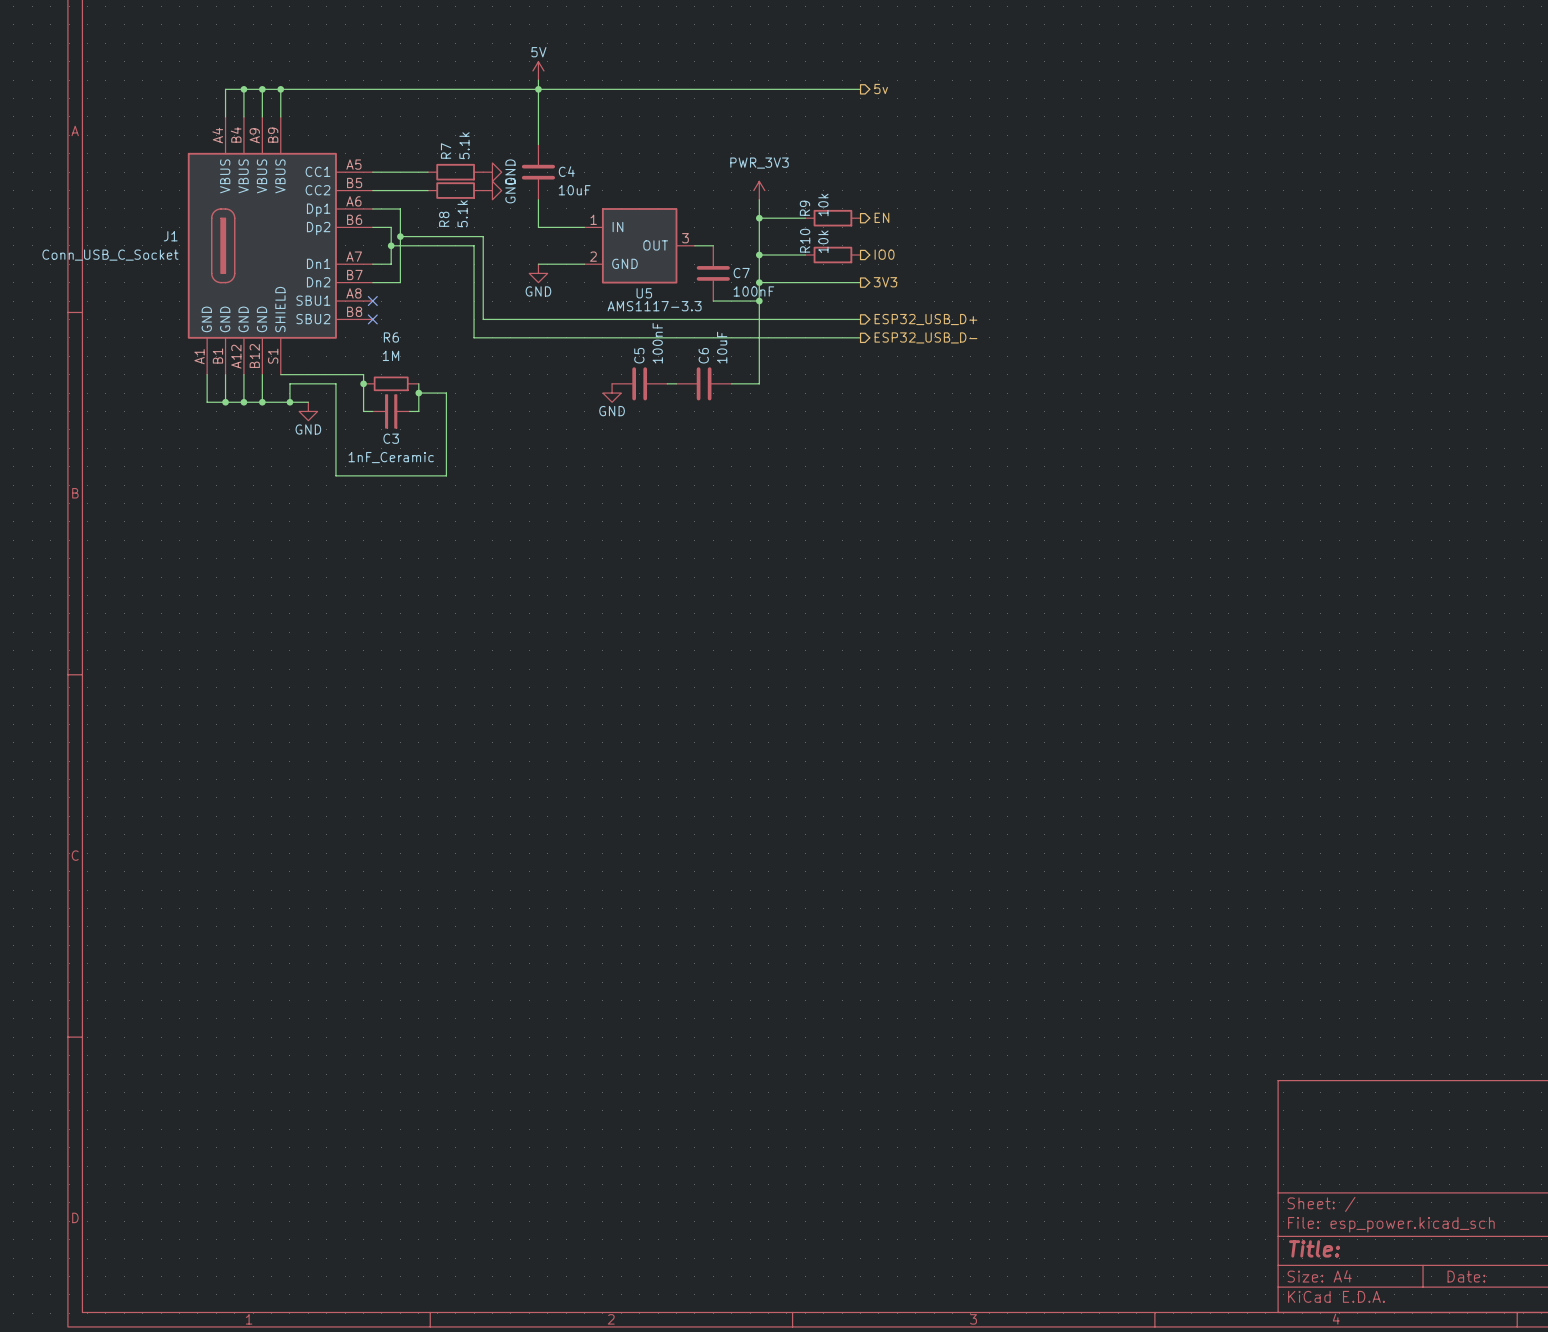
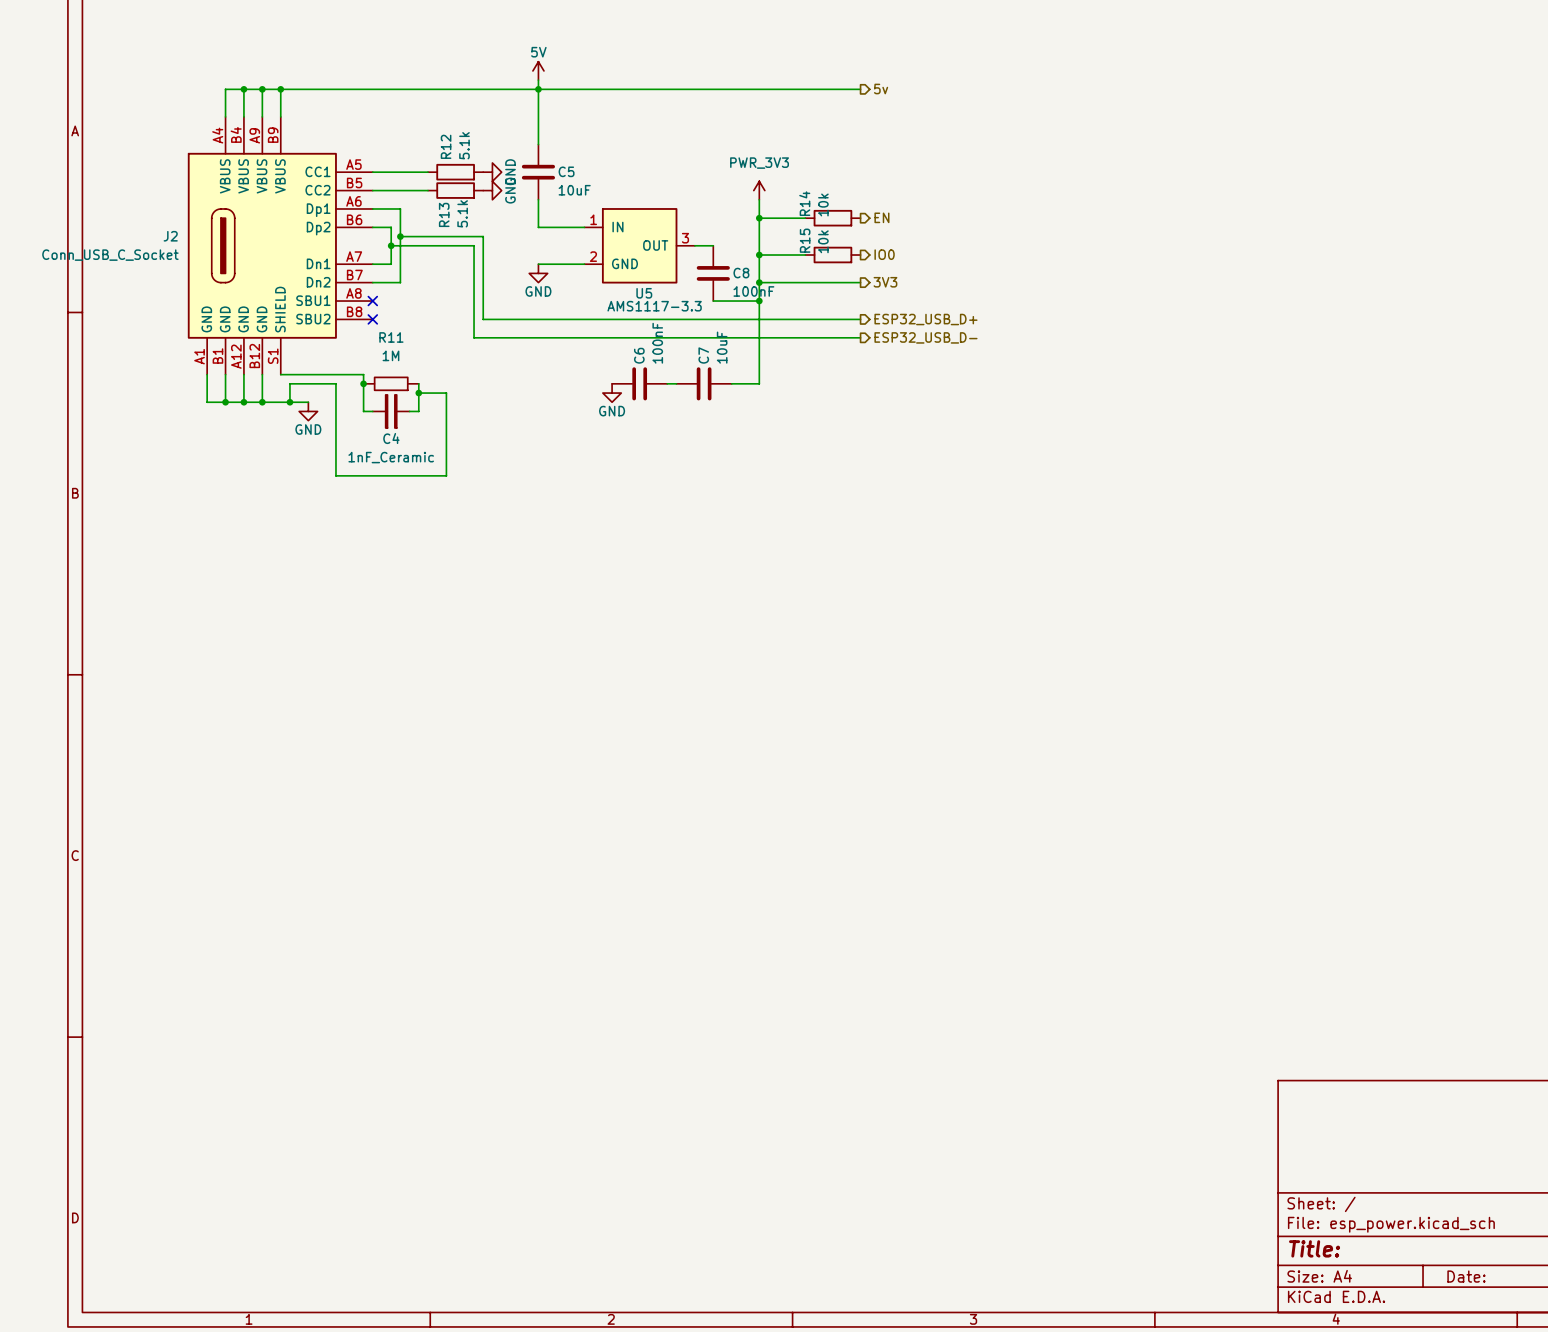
R7 name: R7 (446, 150) -> R12 (446, 146)
C4 name: C4 (566, 171) -> C5 (566, 171)
R9 name: R9 (804, 208) -> R14 (804, 203)
R8 name: R8 (444, 219) -> R13 (444, 214)
J1 name: J1 (170, 236) -> J2 (170, 236)
R10 name: R10 (805, 240) -> R15 (805, 240)
C7 name: C7 (741, 273) -> C8 (741, 273)
R6 name: R6 (391, 337) -> R11 (391, 337)
C5 name: C5 (639, 355) -> C6 (639, 355)
C6 name: C6 (703, 355) -> C7 (703, 355)
C3 name: C3 (391, 438) -> C4 (391, 438)

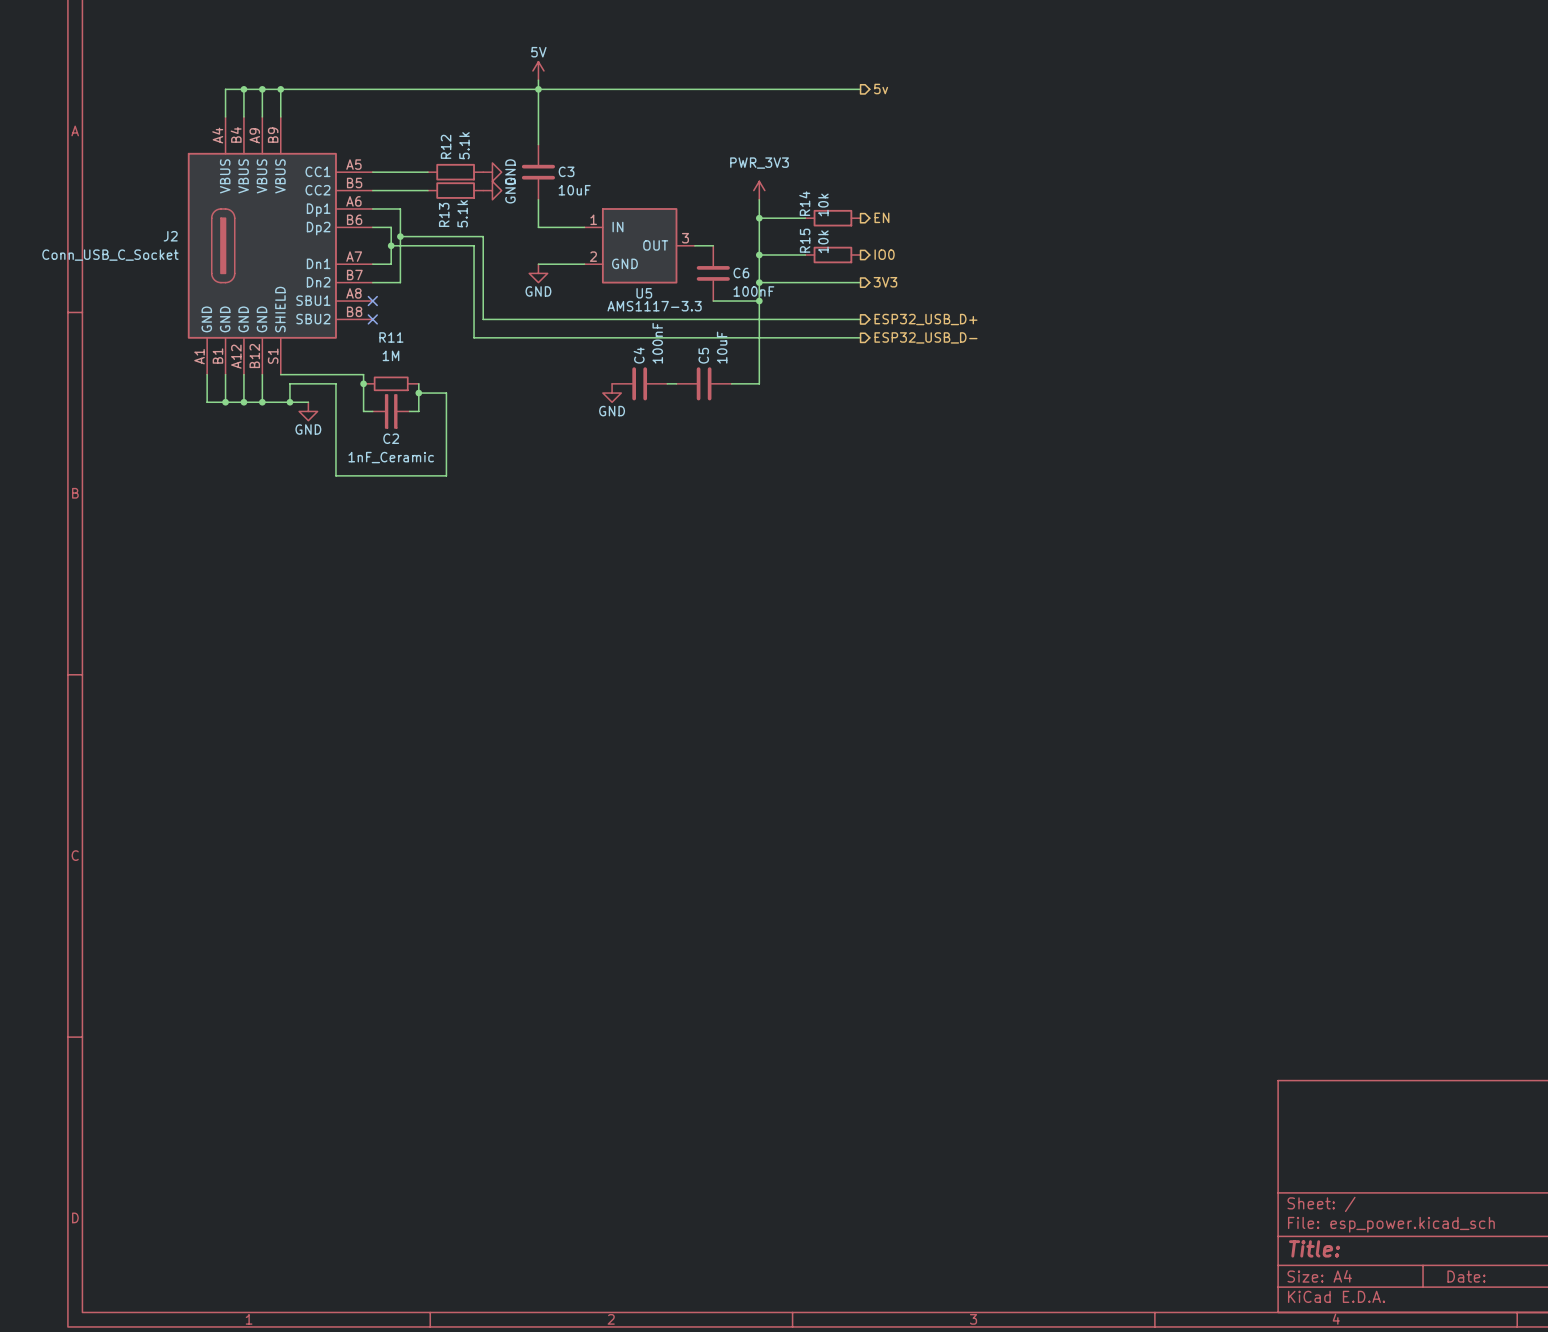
C5 name: C5 (566, 171) -> C3 (566, 171)
C8 name: C8 (741, 273) -> C6 (741, 273)
C6 name: C6 (639, 355) -> C4 (639, 355)
C7 name: C7 (703, 355) -> C5 (703, 355)
C4 name: C4 (391, 438) -> C2 (391, 438)

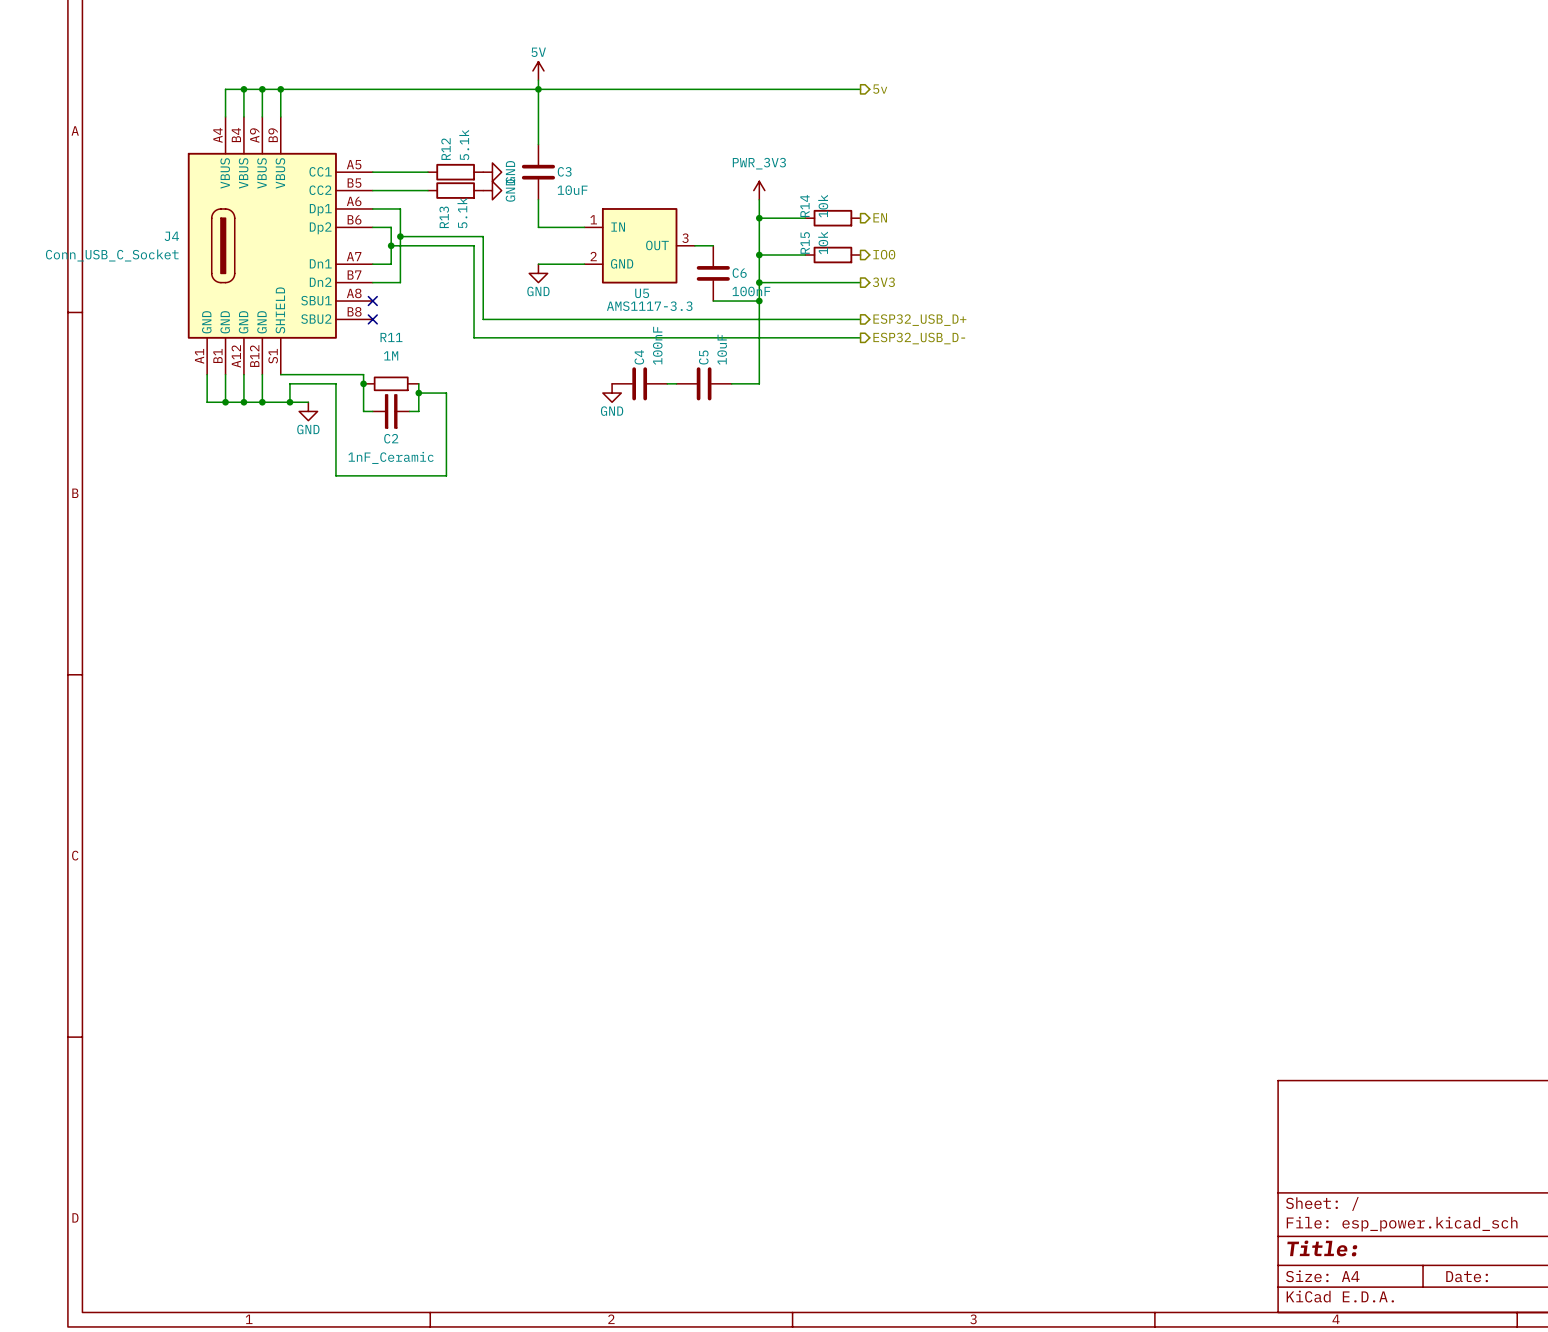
J2 name: J2 (170, 236) -> J4 (171, 236)

